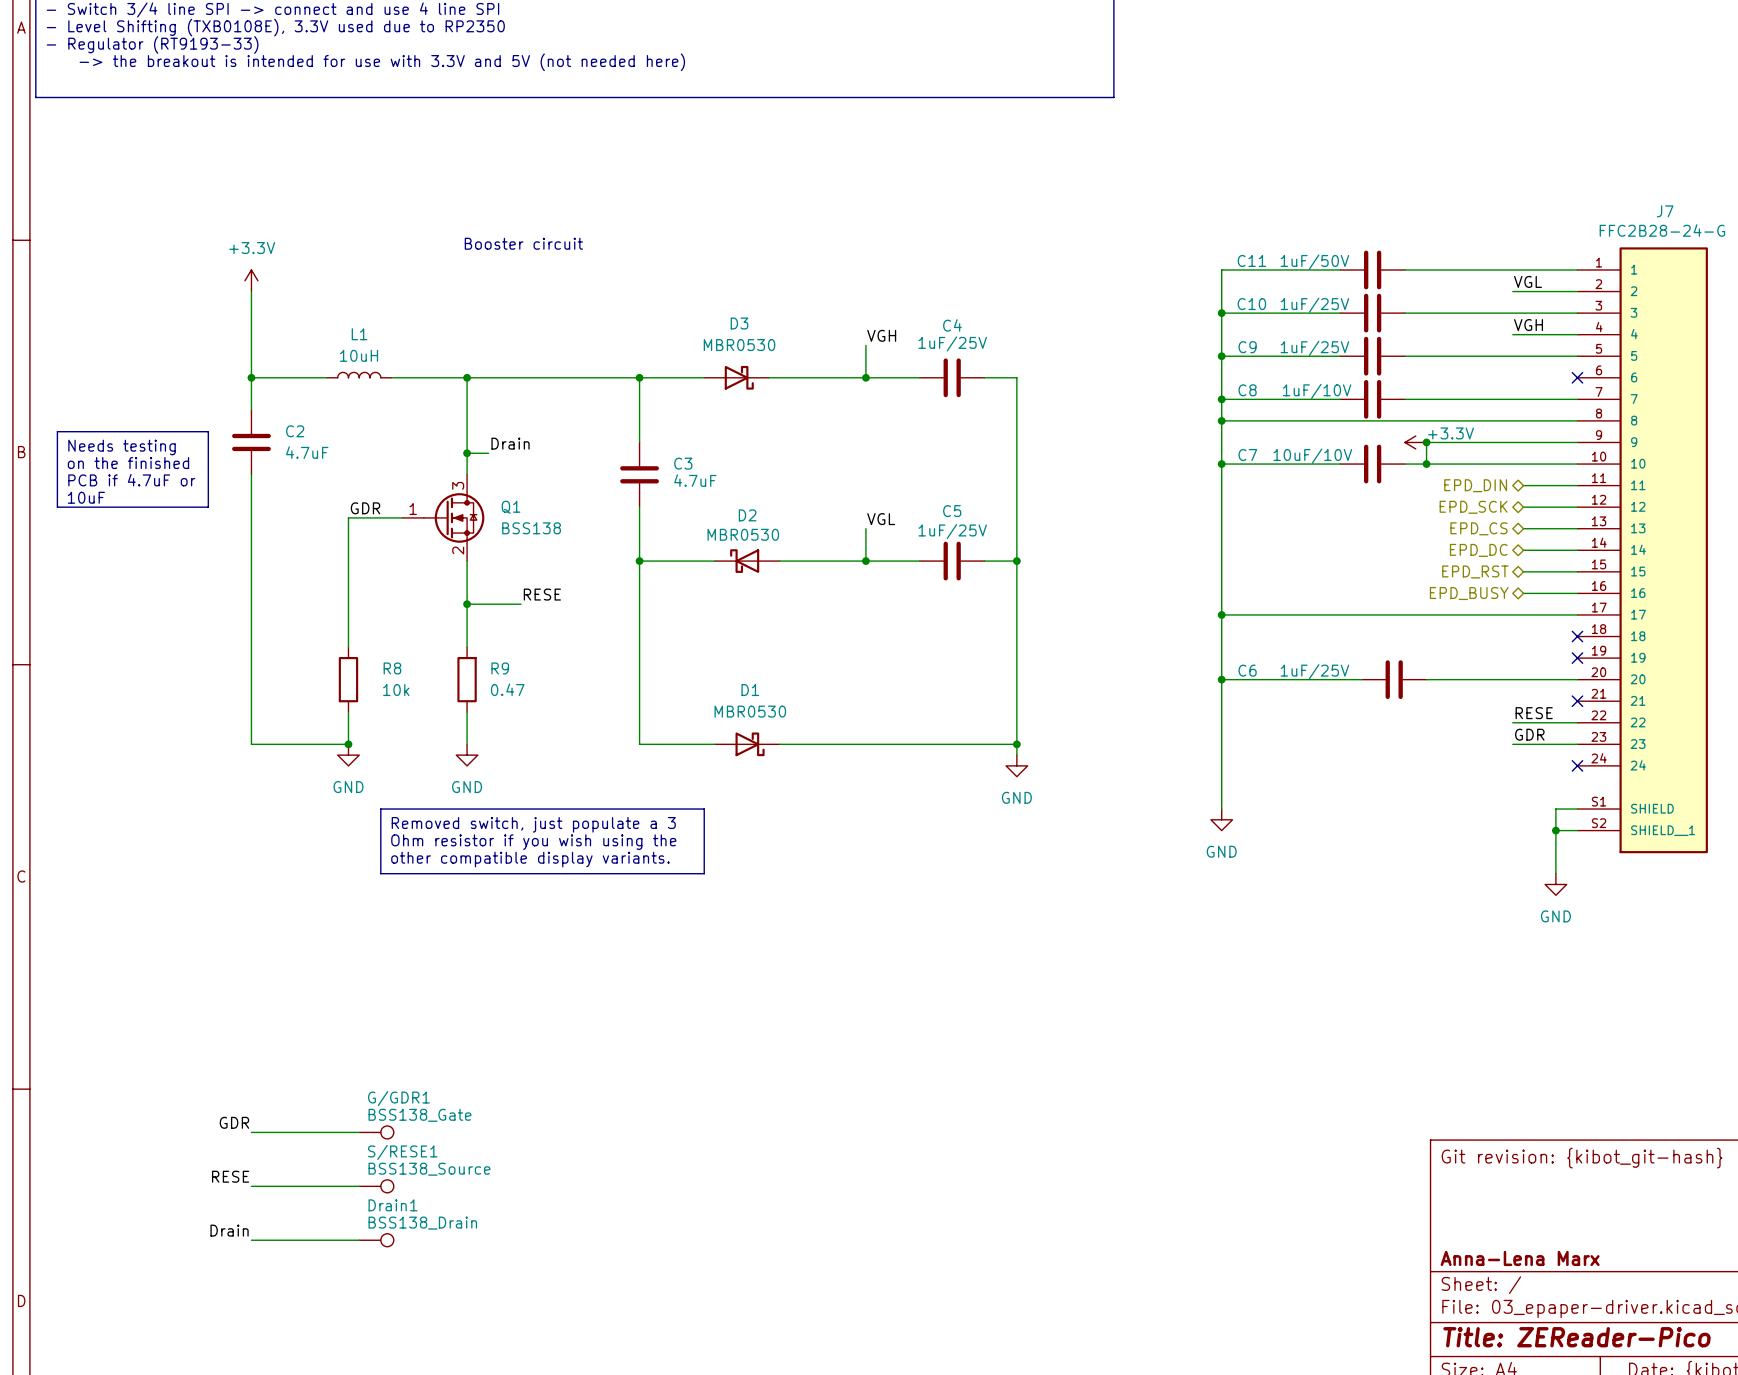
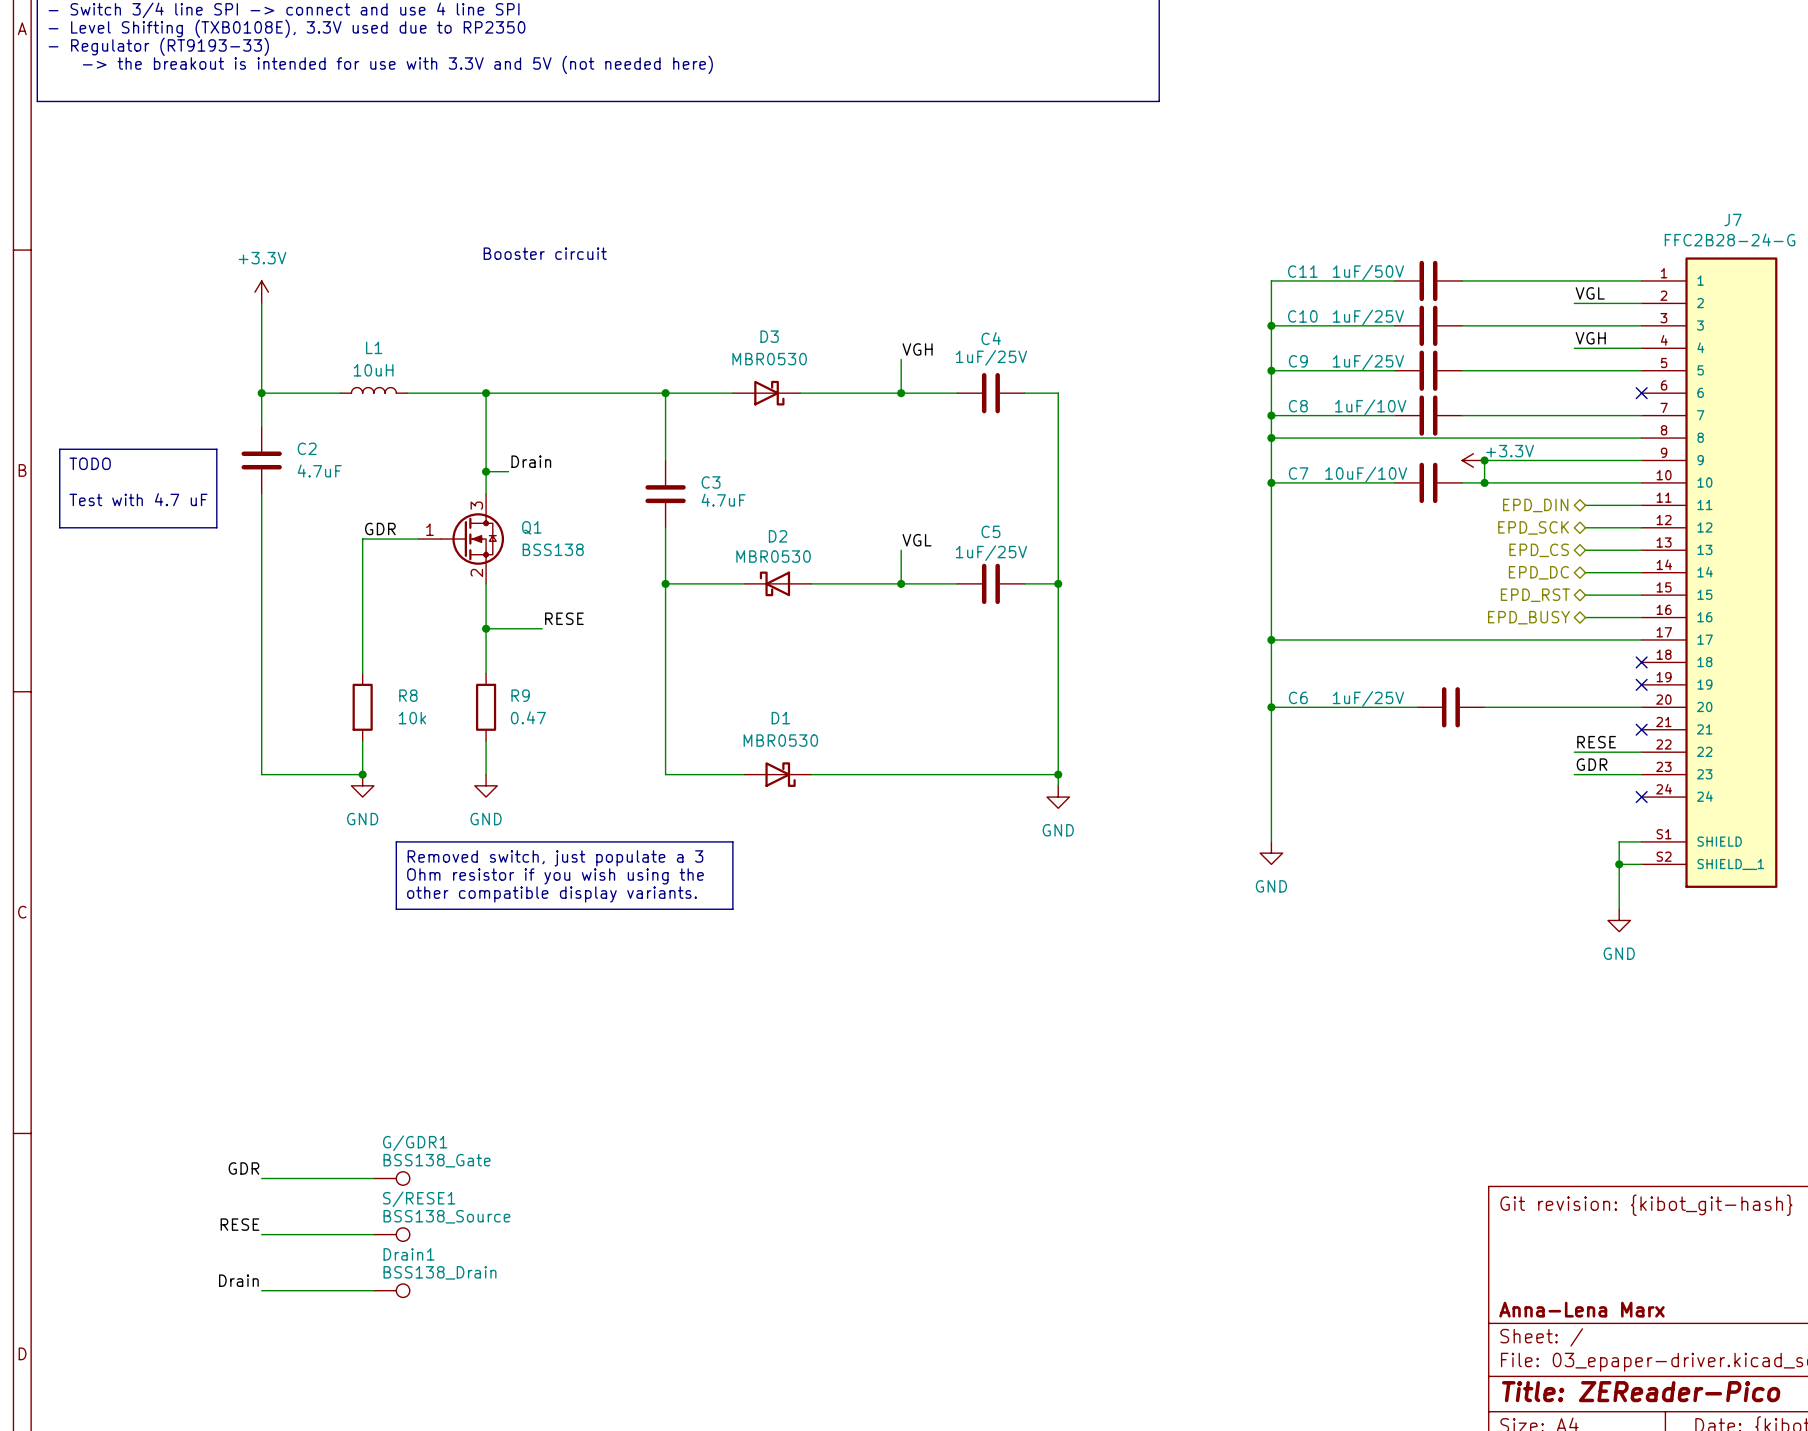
text: Needs testing (122, 447) -> TODO (90, 463)
text: on the finished (128, 463) -> none
text: PCB if 4.7uF or (131, 480) -> Test with 4.7 uF (138, 499)
text: 10uF (86, 497) -> none

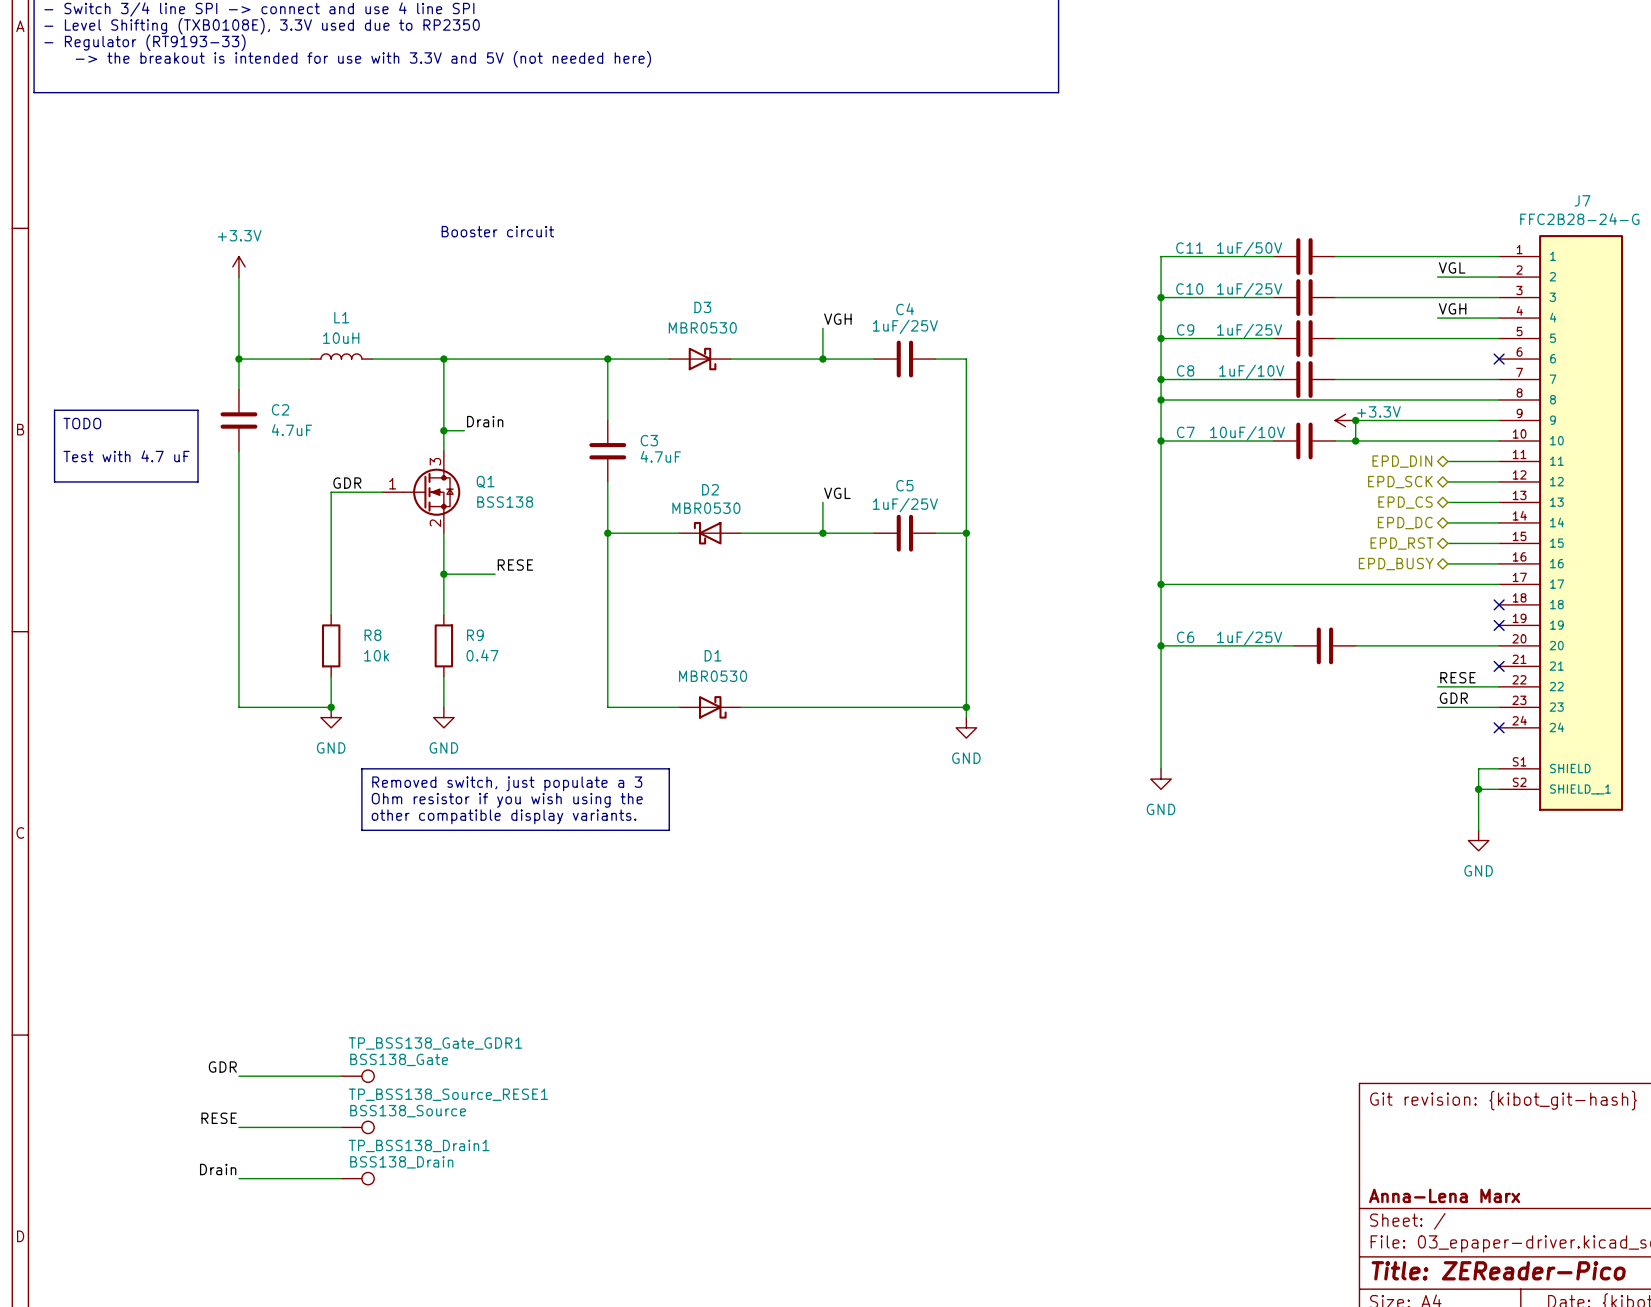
G/GDR1 name: G/GDR1 (415, 1143) -> TP_BSS138_Gate_GDR1 (435, 1043)
S/RESE1 name: S/RESE1 (419, 1199) -> TP_BSS138_Source_RESE1 (448, 1094)
Drain1 name: Drain1 (409, 1254) -> TP_BSS138_Drain1 (419, 1145)

